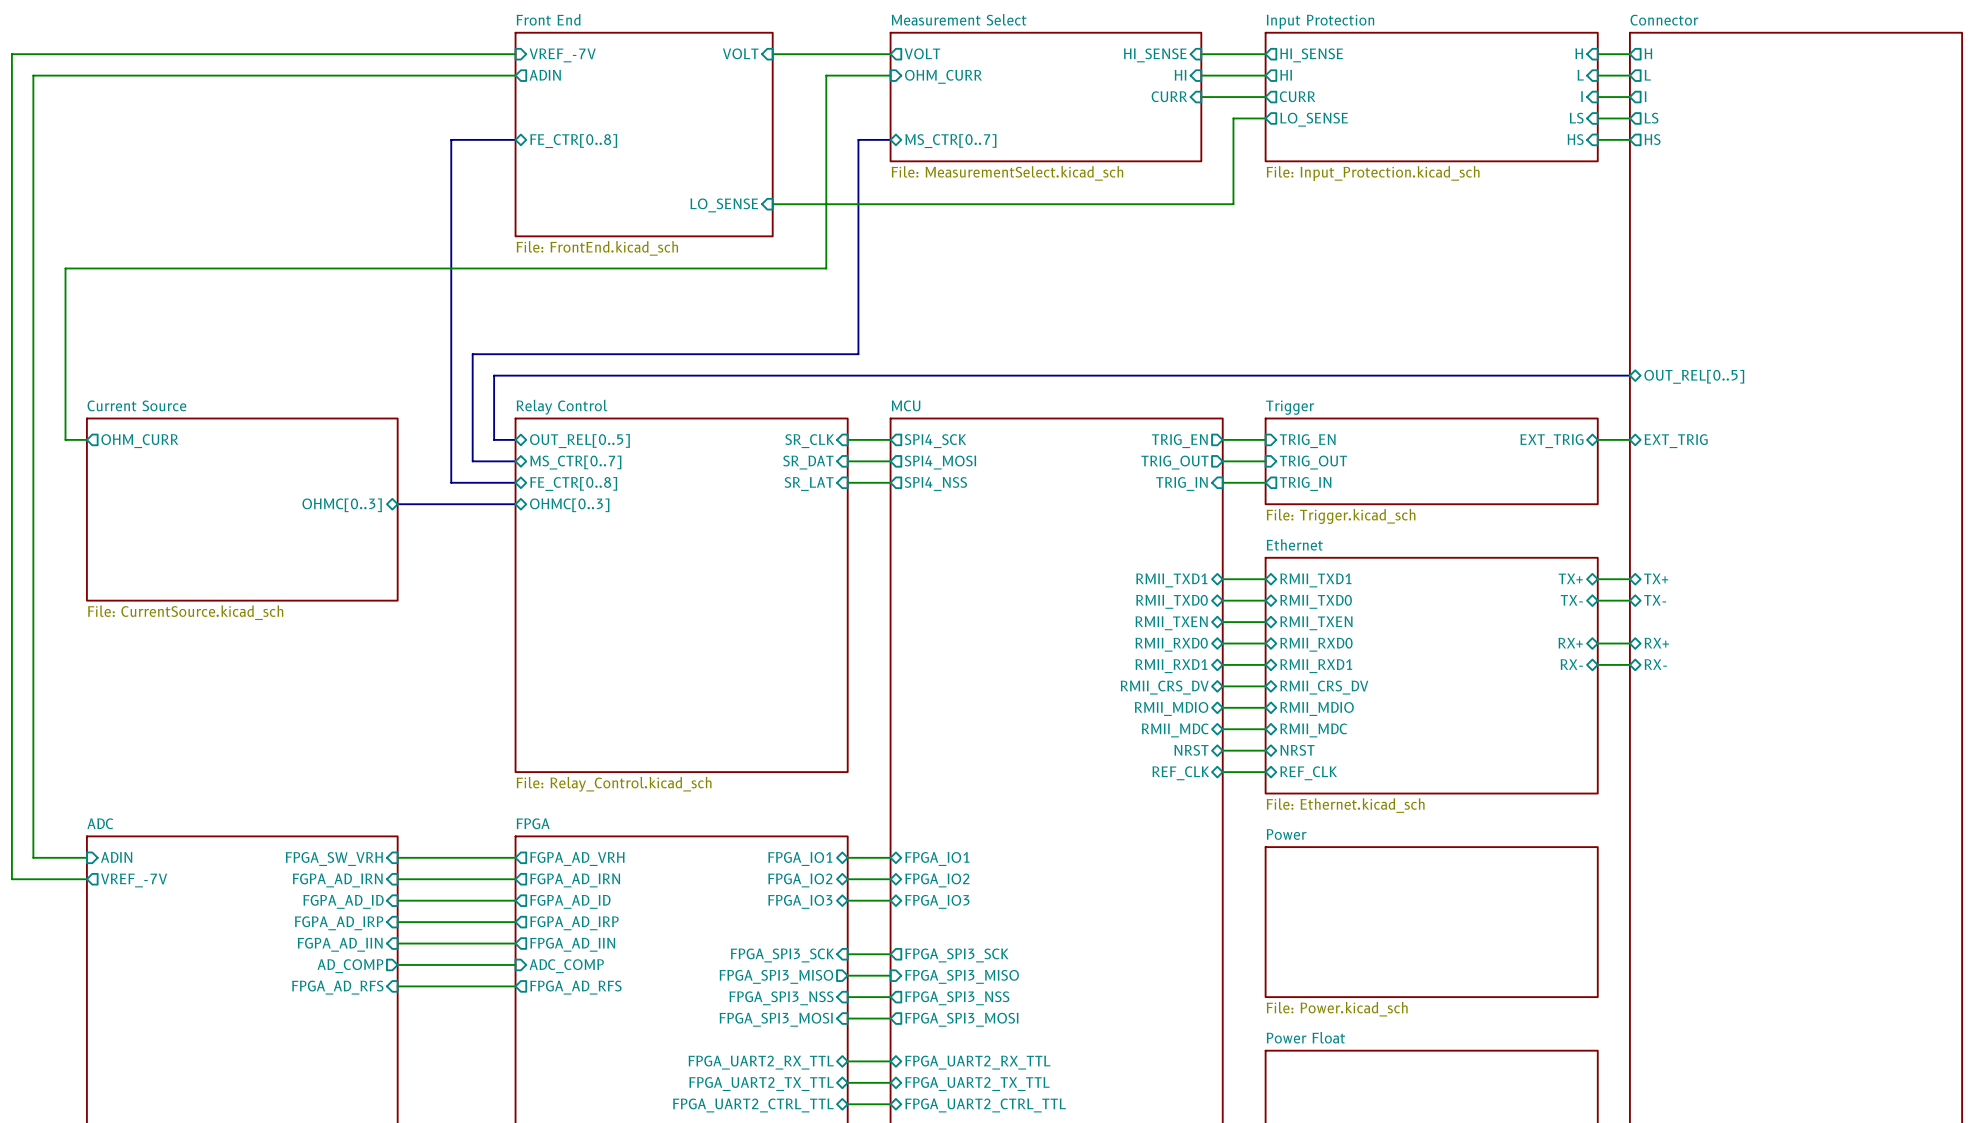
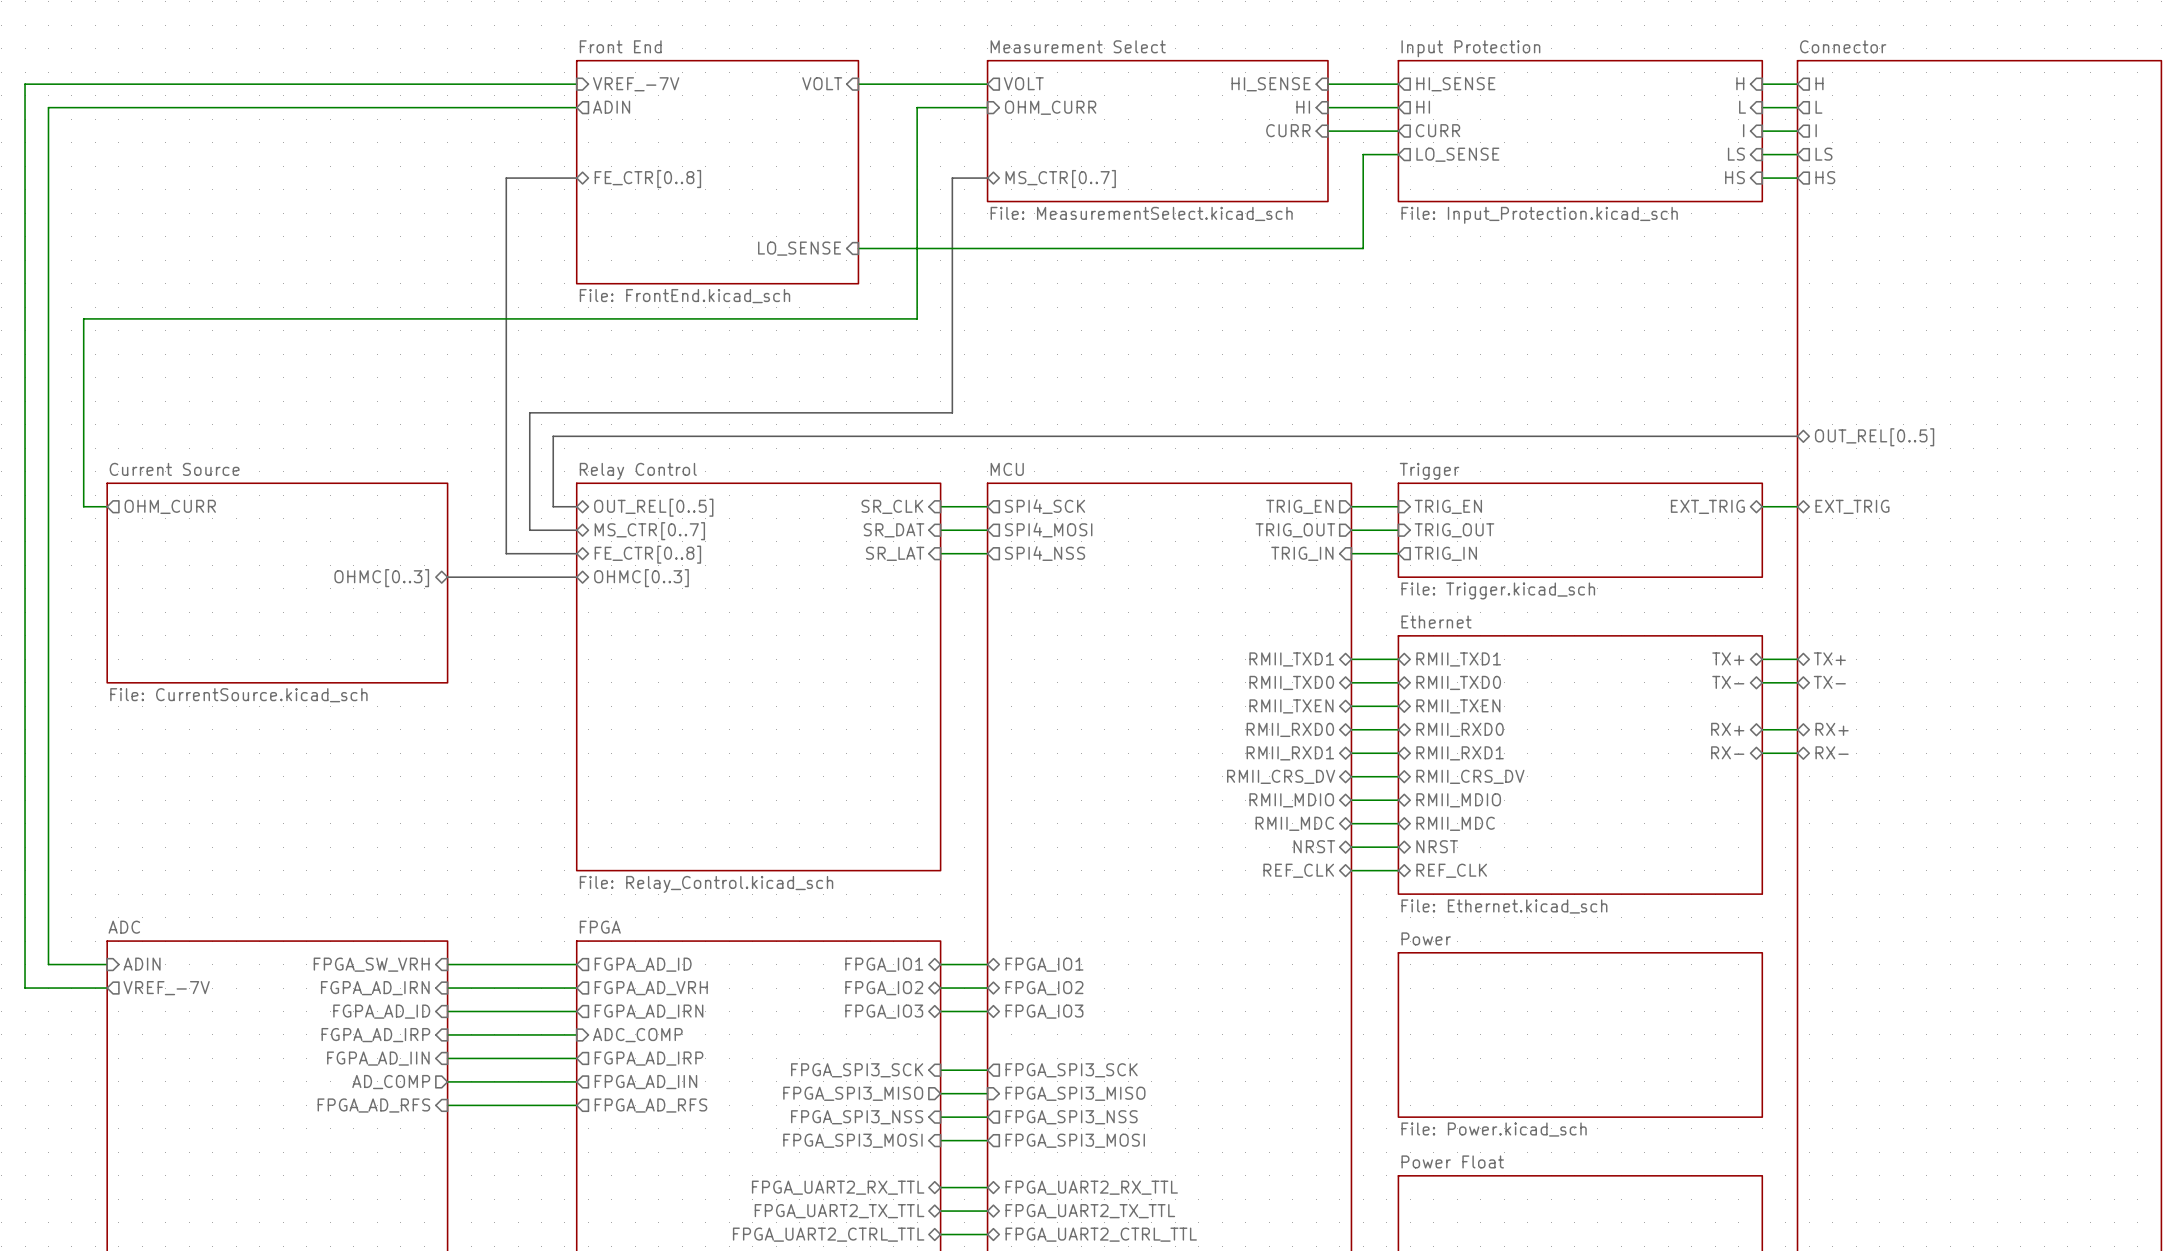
sheet pin: FGPA_AD_VRH (577, 859) -> FGPA_AD_ID (643, 964)
sheet pin: FGPA_AD_IRN (575, 880) -> FGPA_AD_VRH (651, 988)
sheet pin: FGPA_AD_ID (570, 901) -> FGPA_AD_IRN (649, 1011)
sheet pin shape: output (574, 923) -> input (637, 1035)
sheet pin: FGPA_AD_IRP (574, 923) -> ADC_COMP (637, 1035)
sheet pin: FPGA_AD_IIN (572, 944) -> FGPA_AD_IRP (649, 1058)
sheet pin shape: input (566, 966) -> output (645, 1082)
sheet pin: ADC_COMP (566, 966) -> FPGA_AD_IIN (645, 1082)

